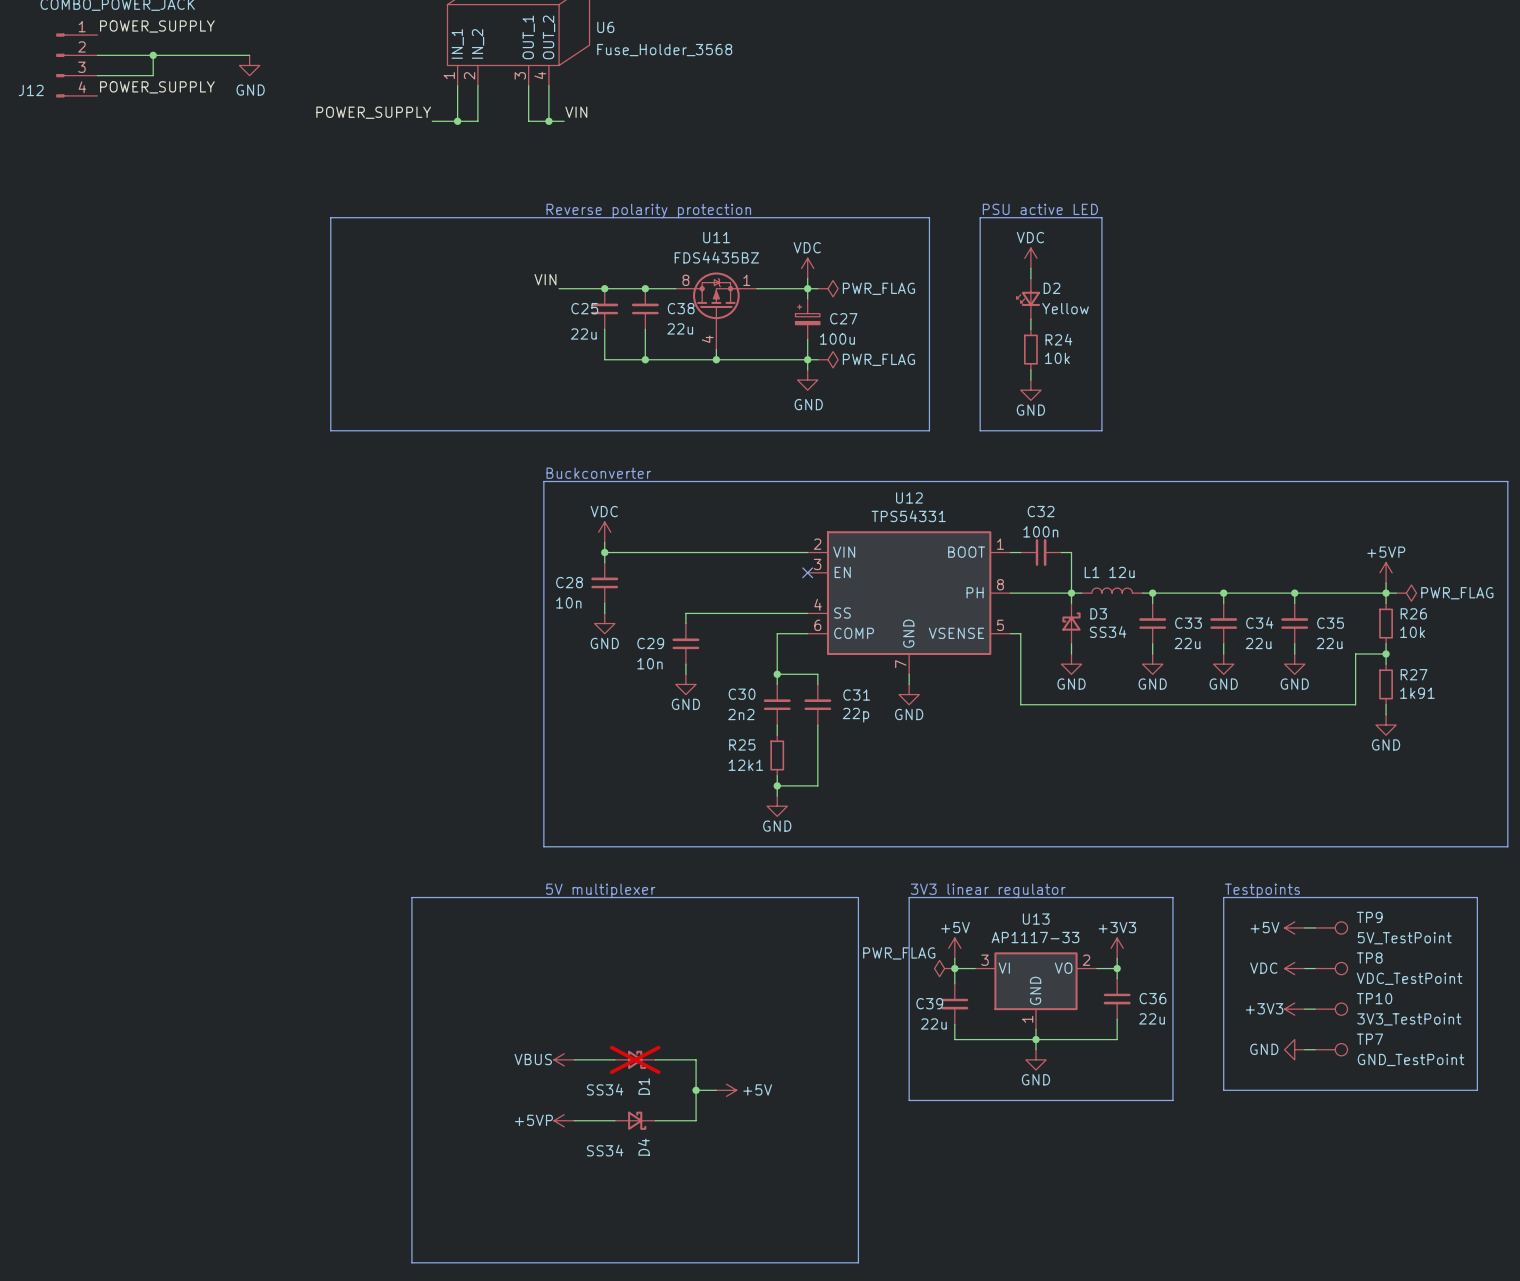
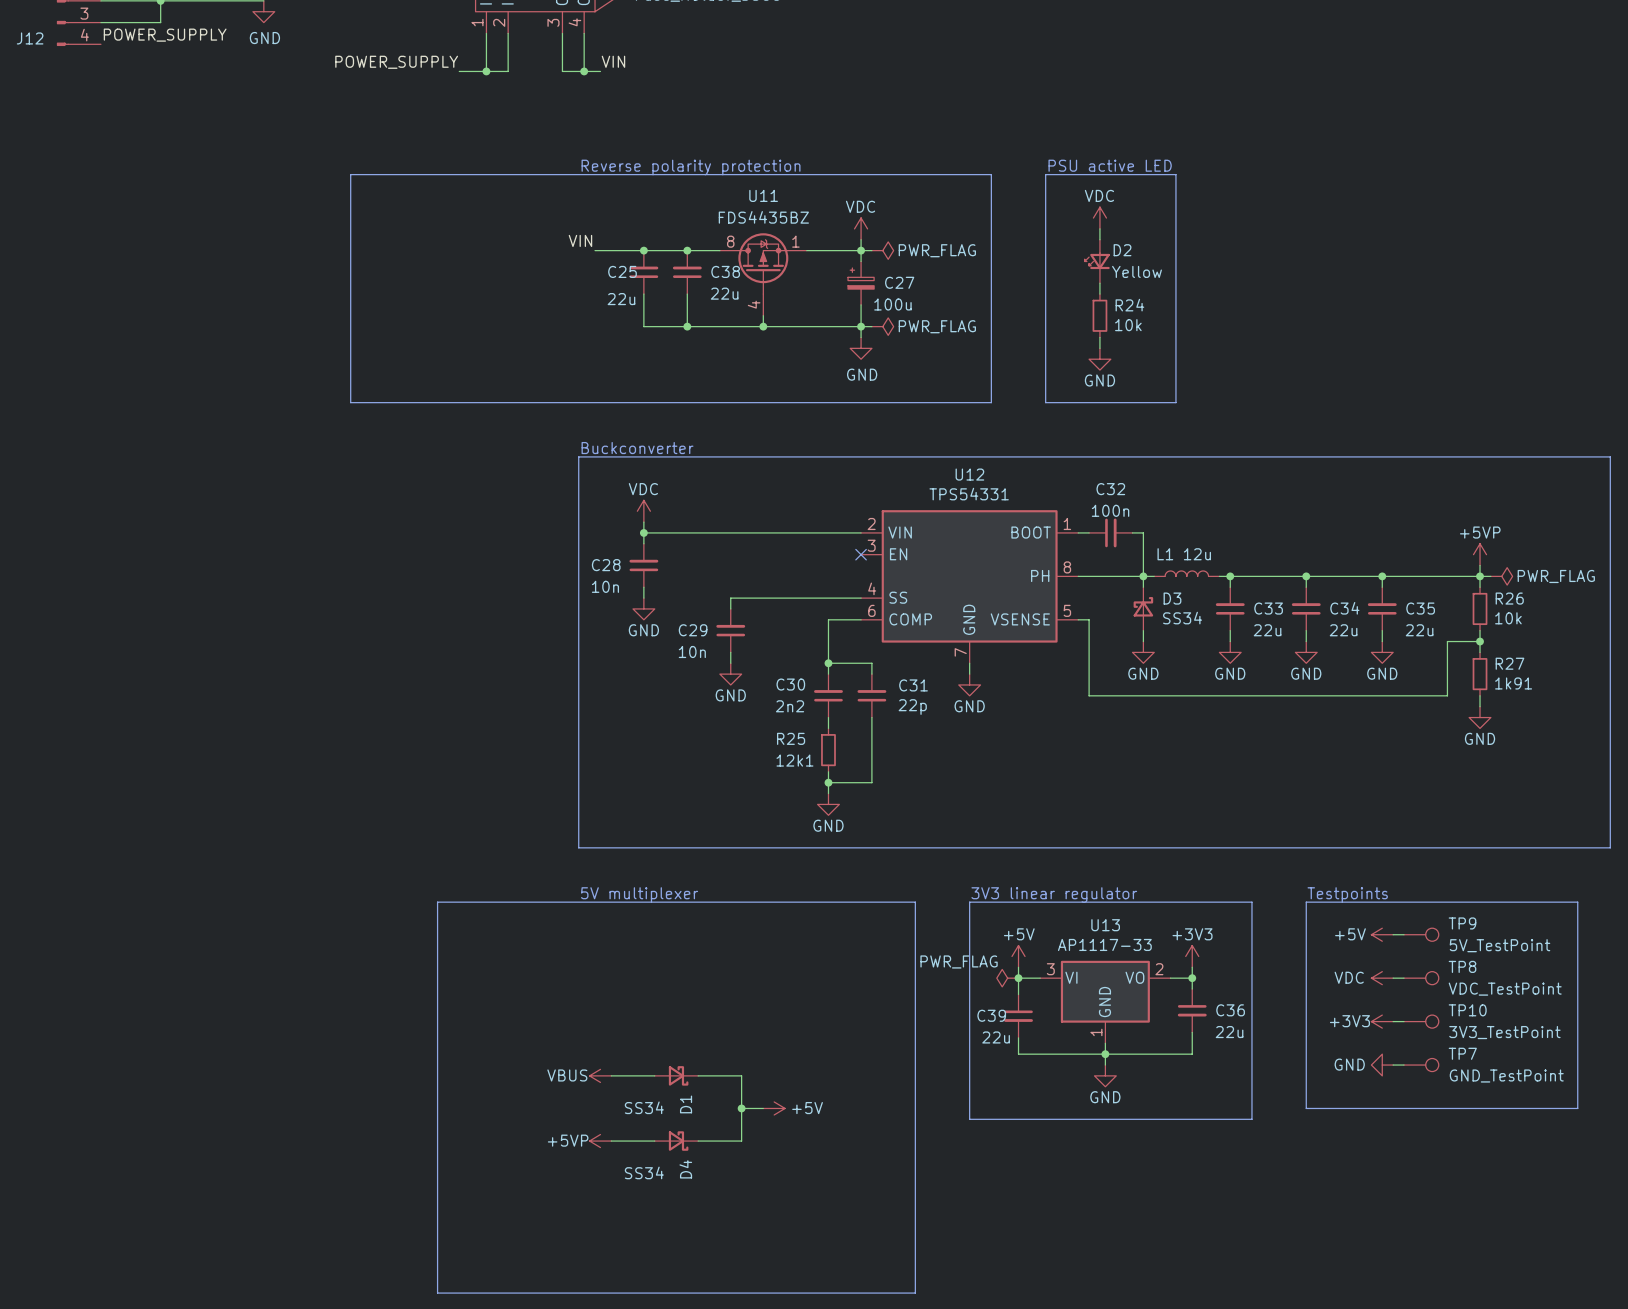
D1 do-not-place cross: (635, 1059) -> none

